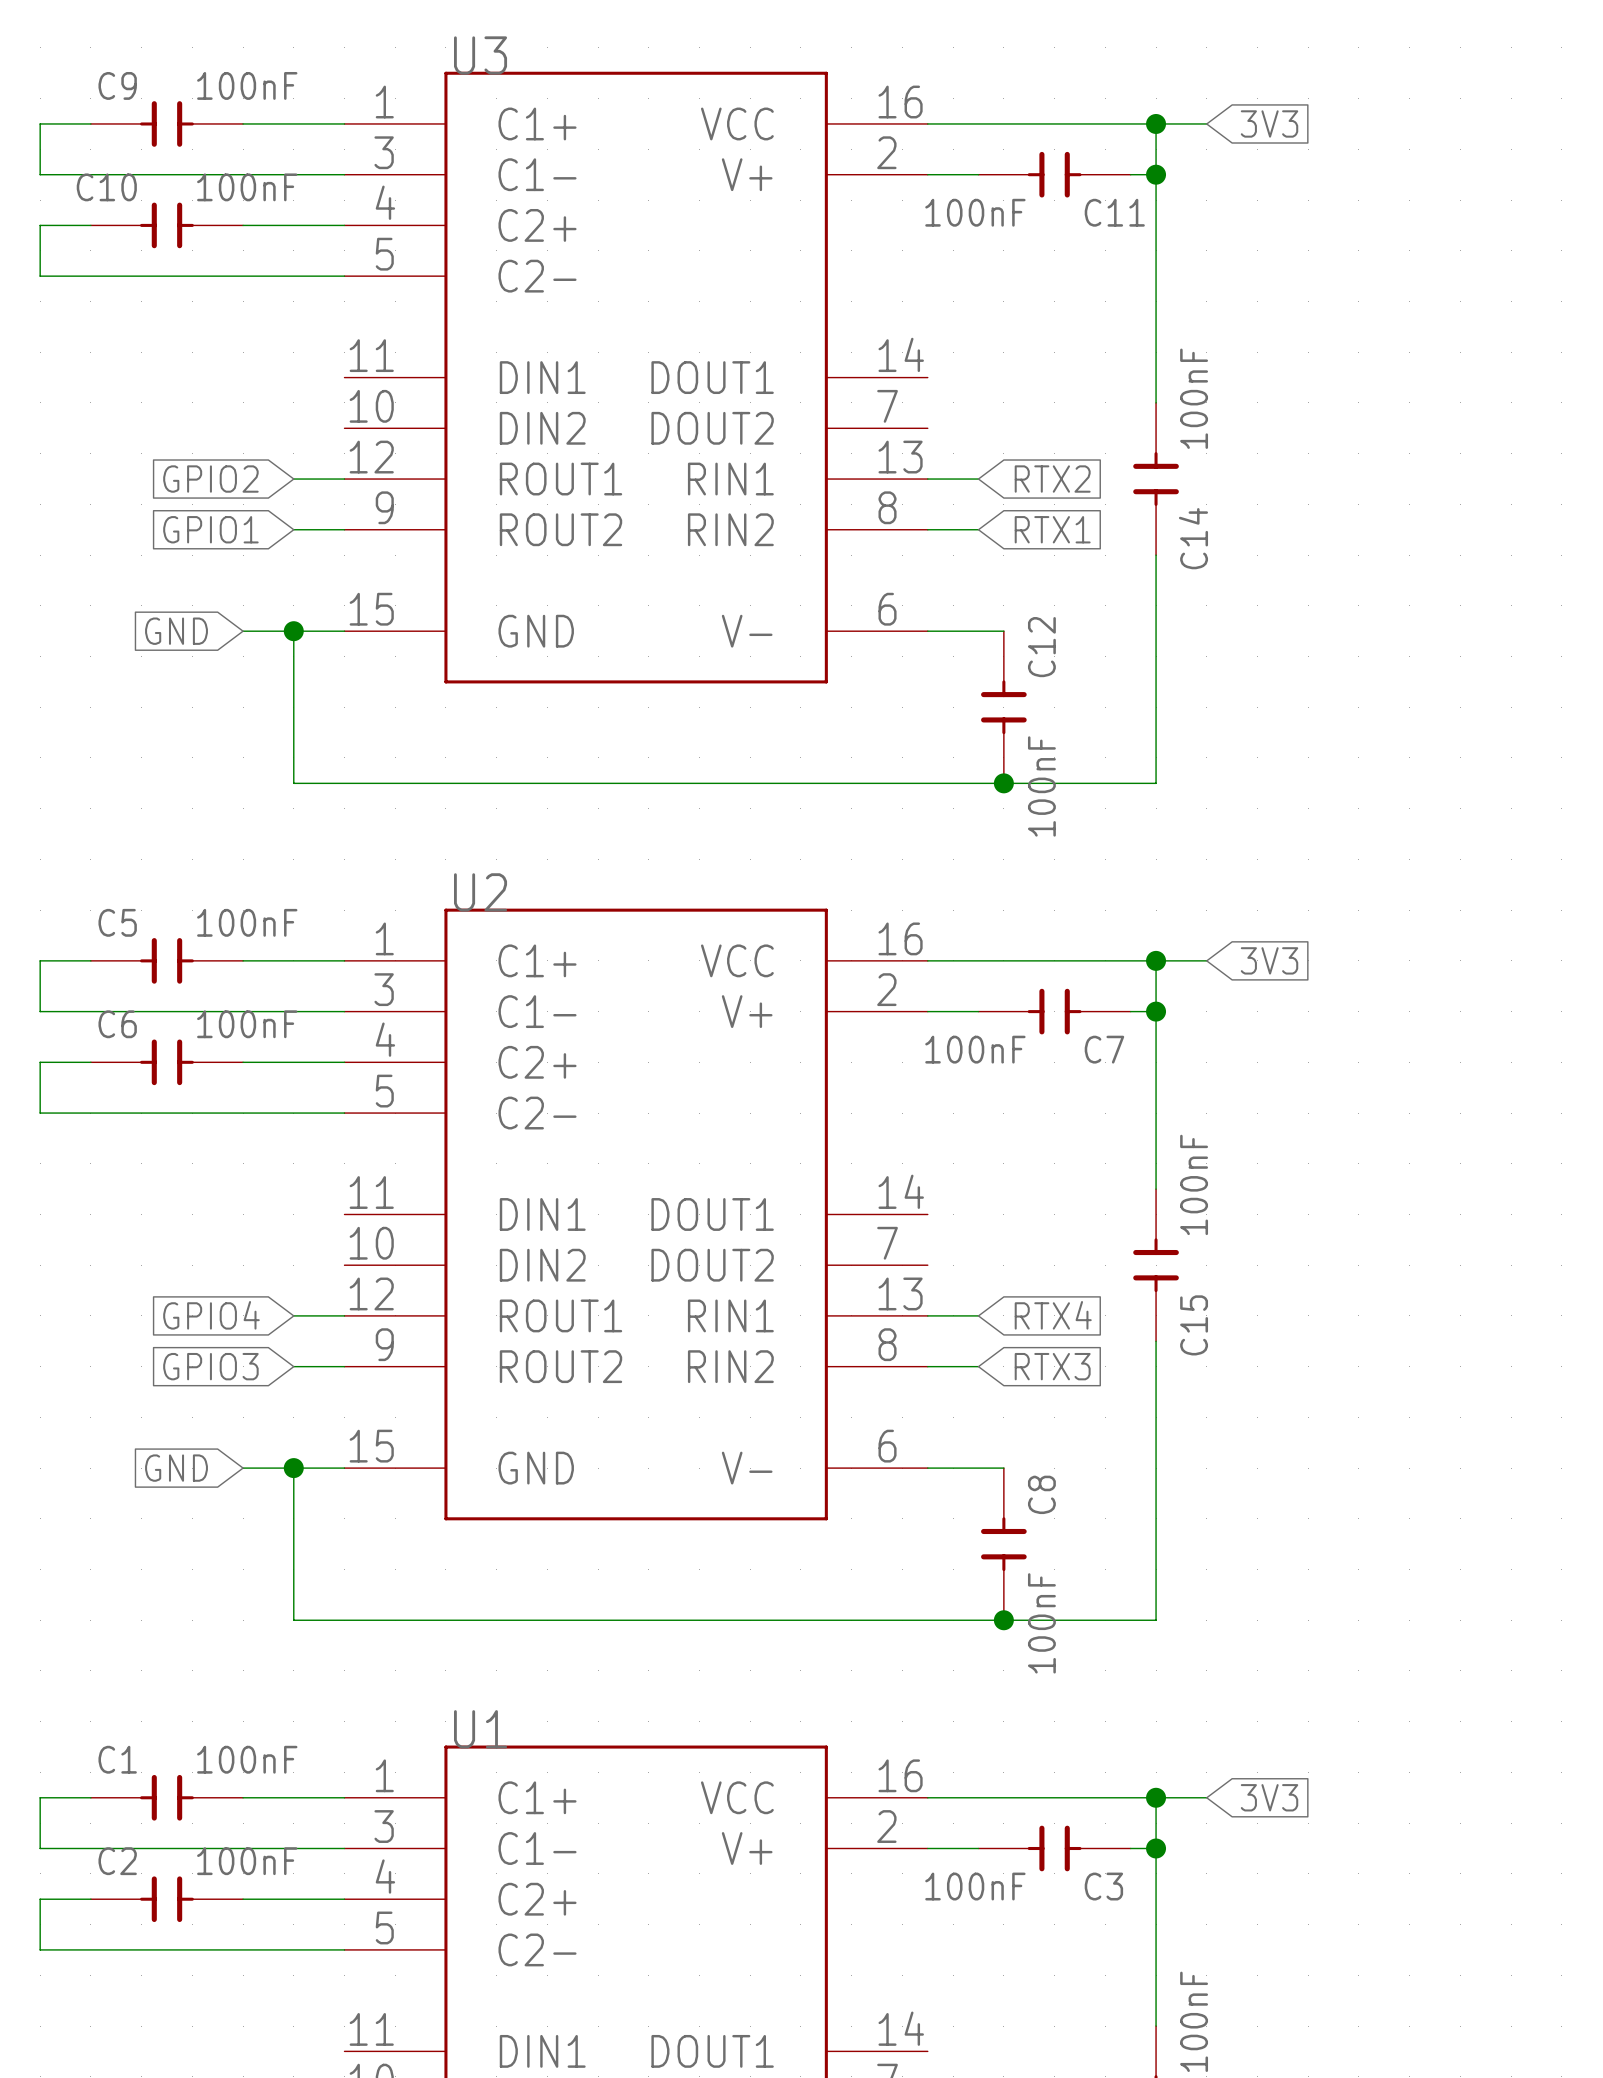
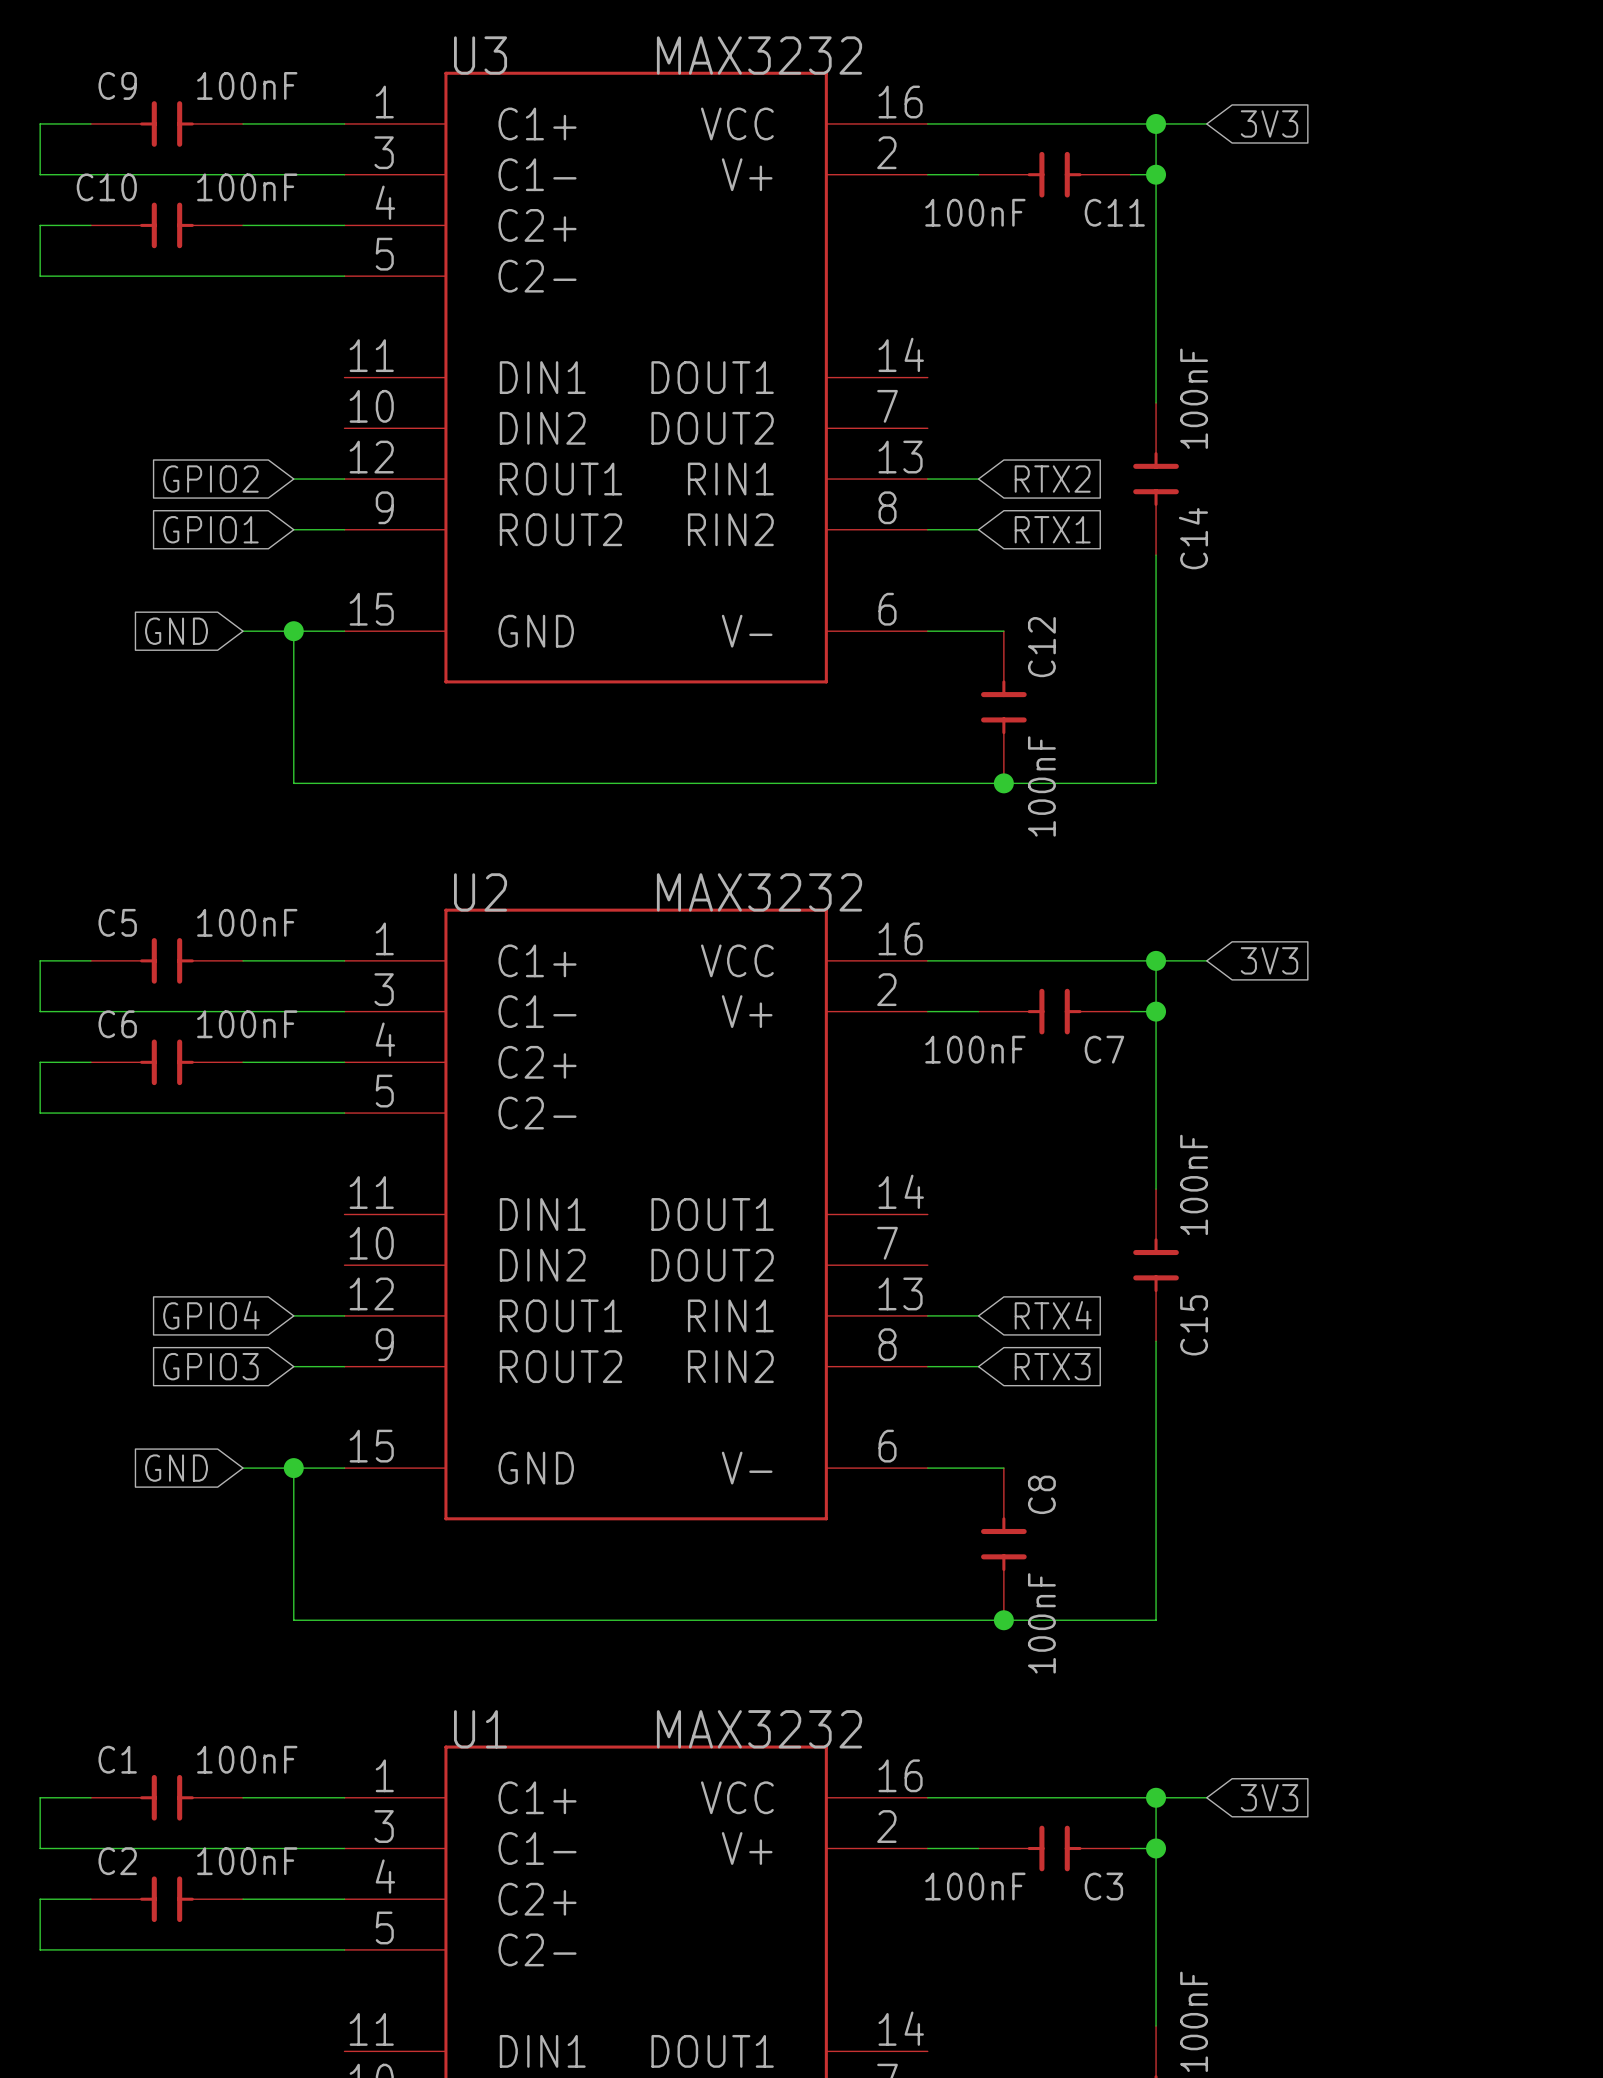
U3 value: none -> MAX3232 (759, 55)
U2 value: none -> MAX3232 (759, 892)
U1 value: none -> MAX3232 (759, 1729)

